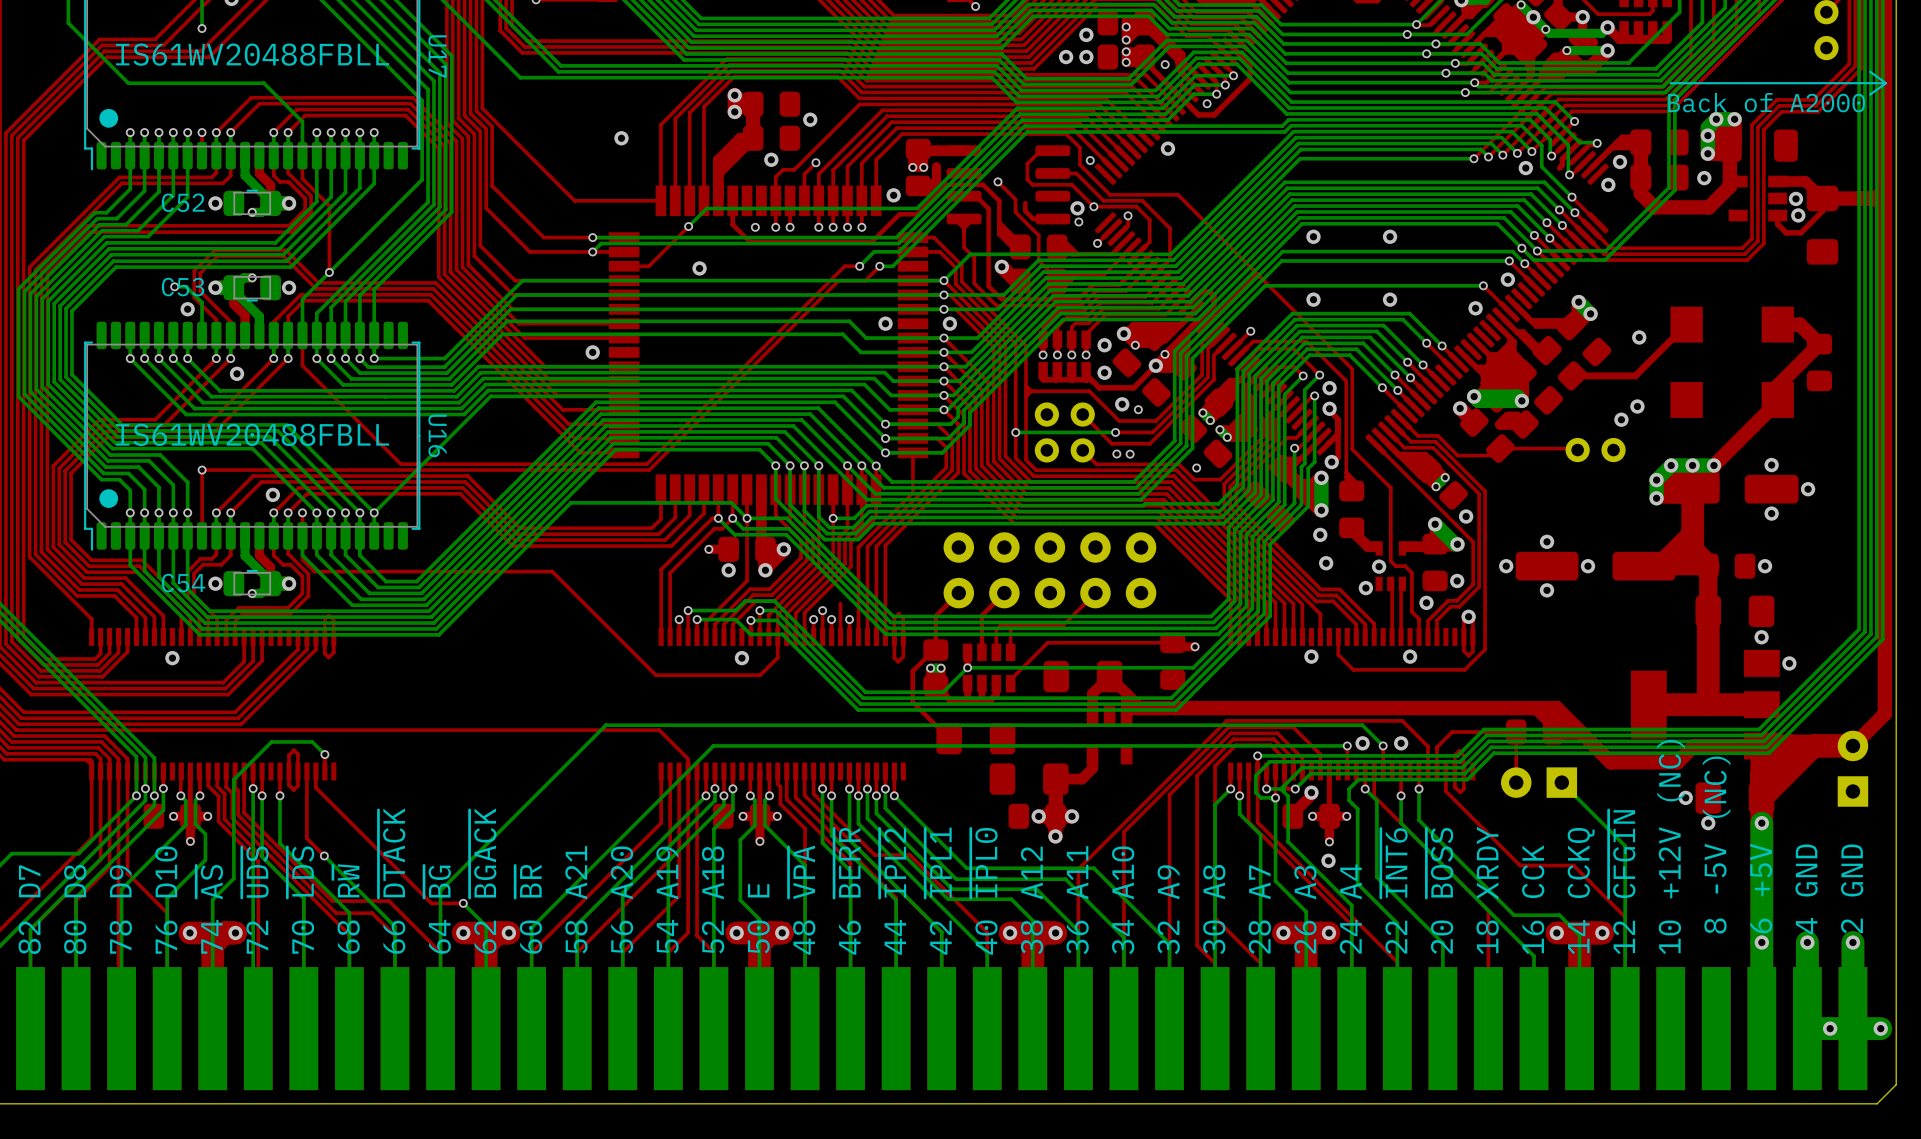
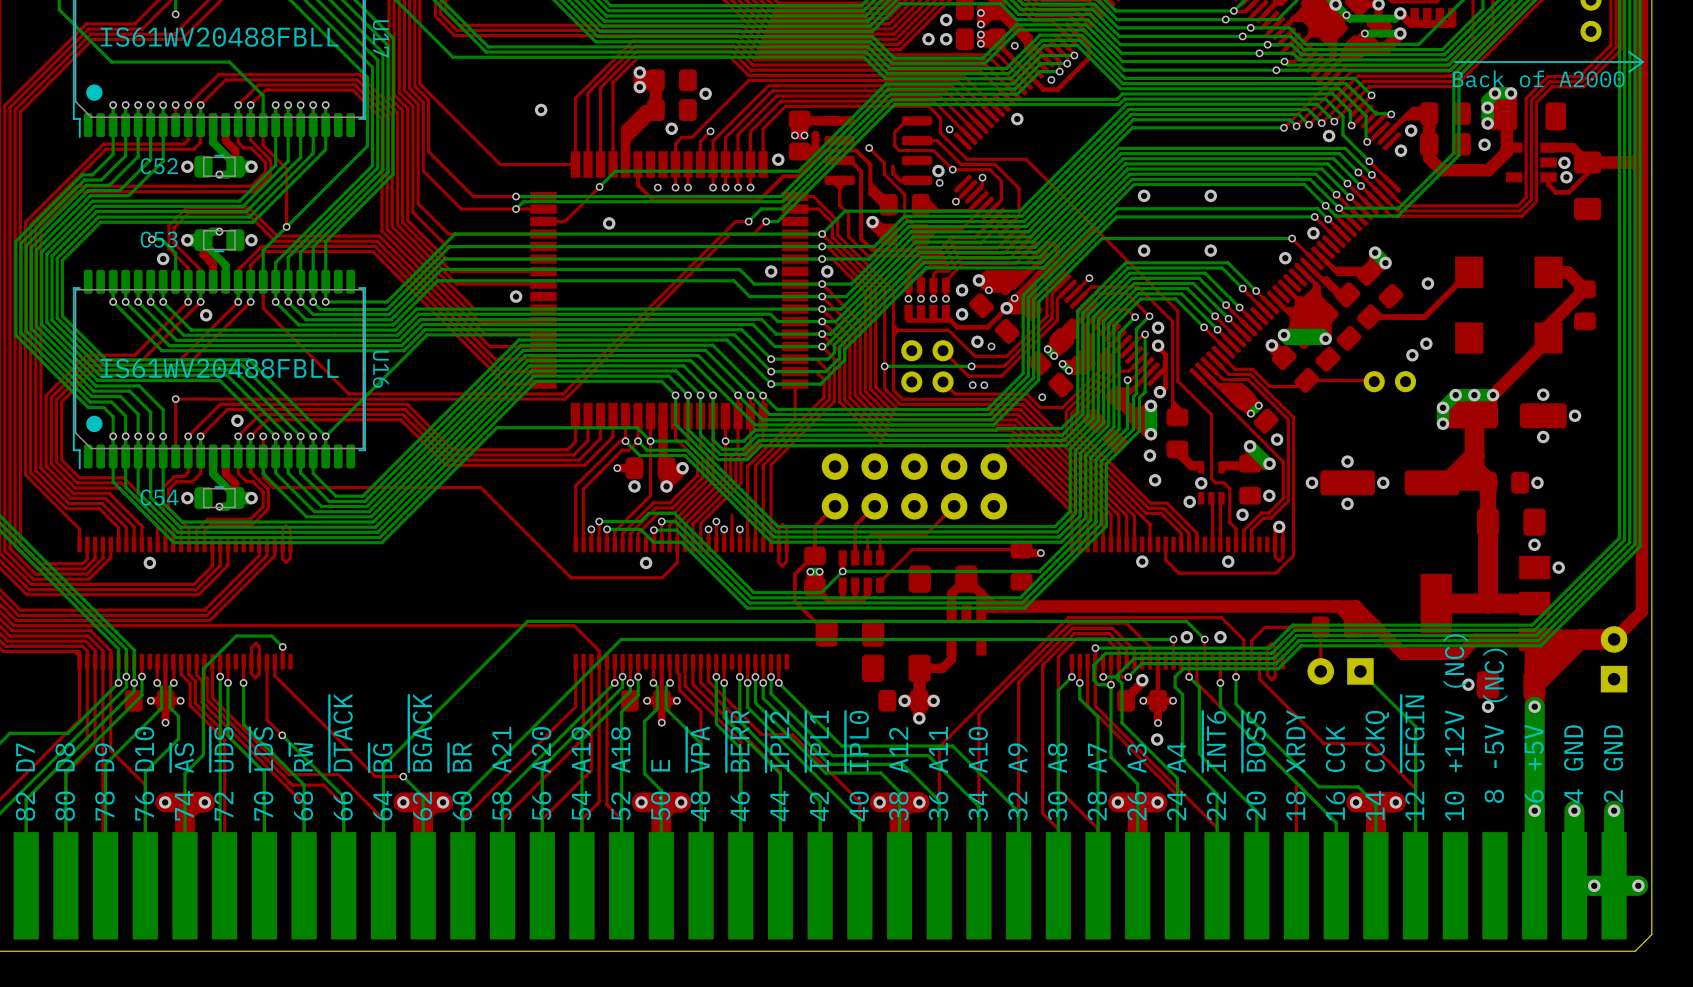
top track: (1572, 148) (1562, 159) (1562, 165) (1559, 168) -> none
top track: (1517, 417) (1524, 424) (1500, 424) (1508, 417) (1517, 417) -> none

